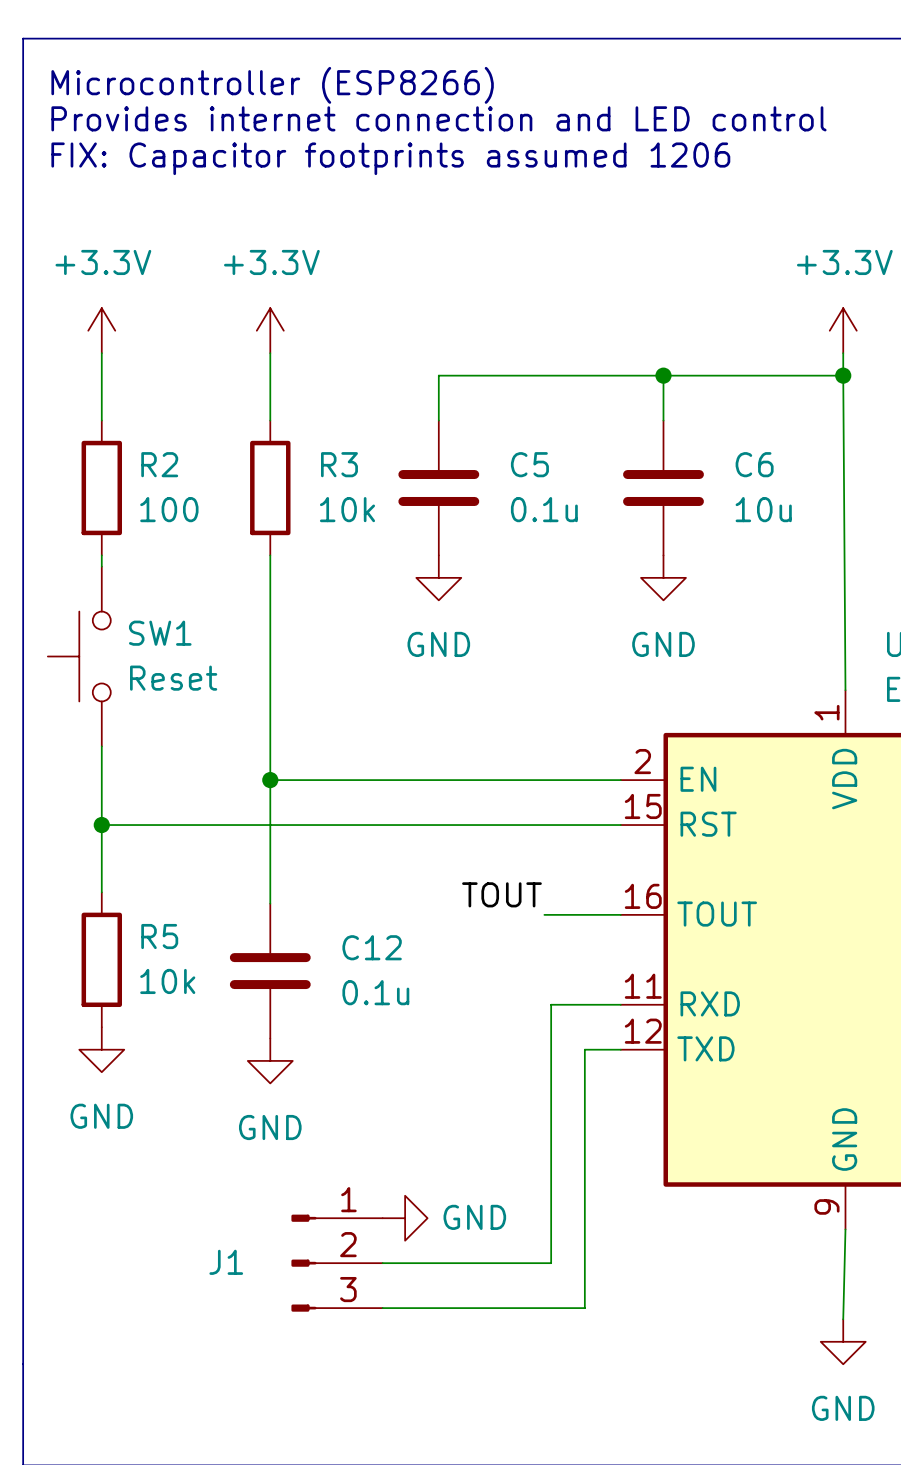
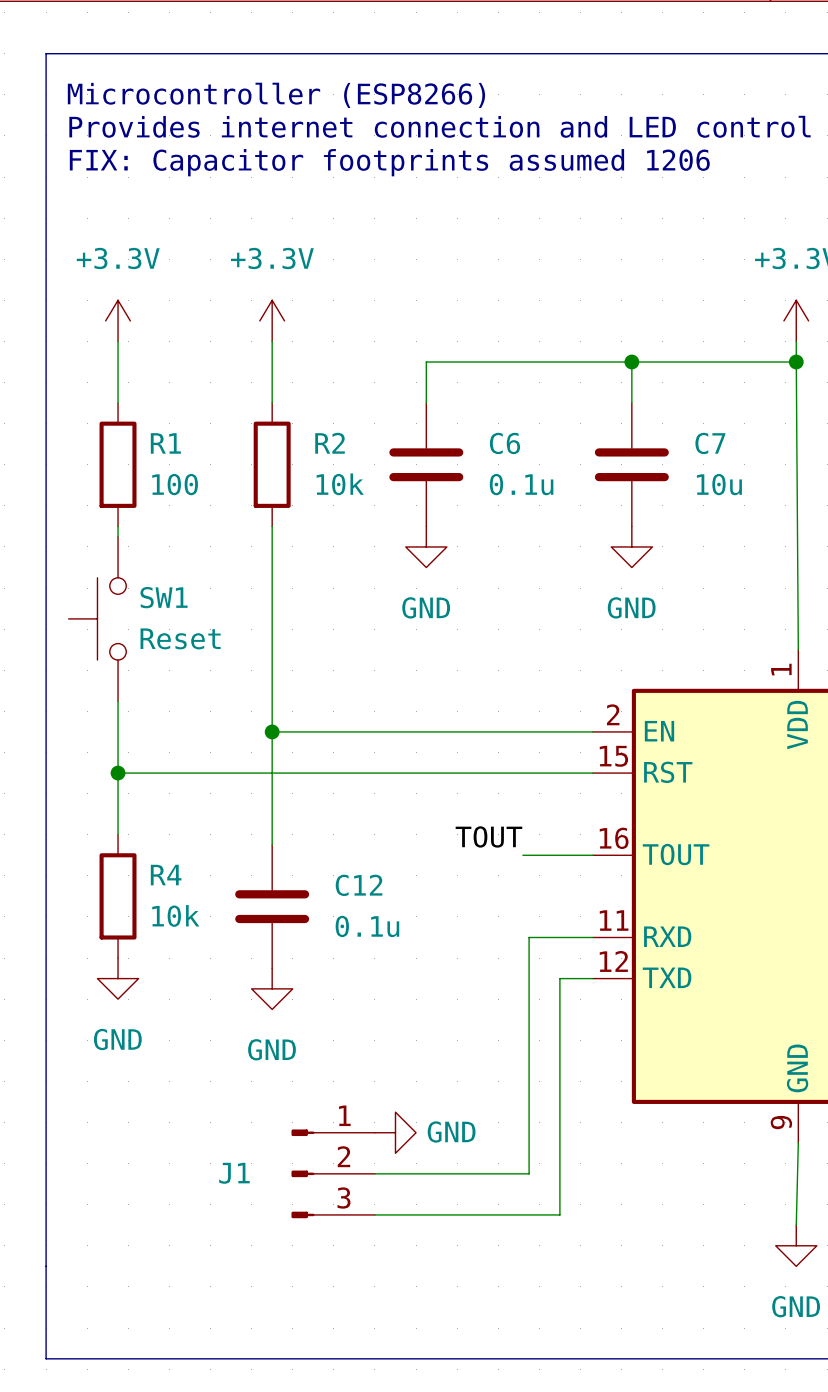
R2 name: R2 (159, 464) -> R1 (165, 443)
R3 name: R3 (339, 464) -> R2 (330, 443)
C5 name: C5 (529, 464) -> C6 (504, 443)
C6 name: C6 (754, 464) -> C7 (710, 443)
R5 name: R5 (159, 936) -> R4 (166, 875)

